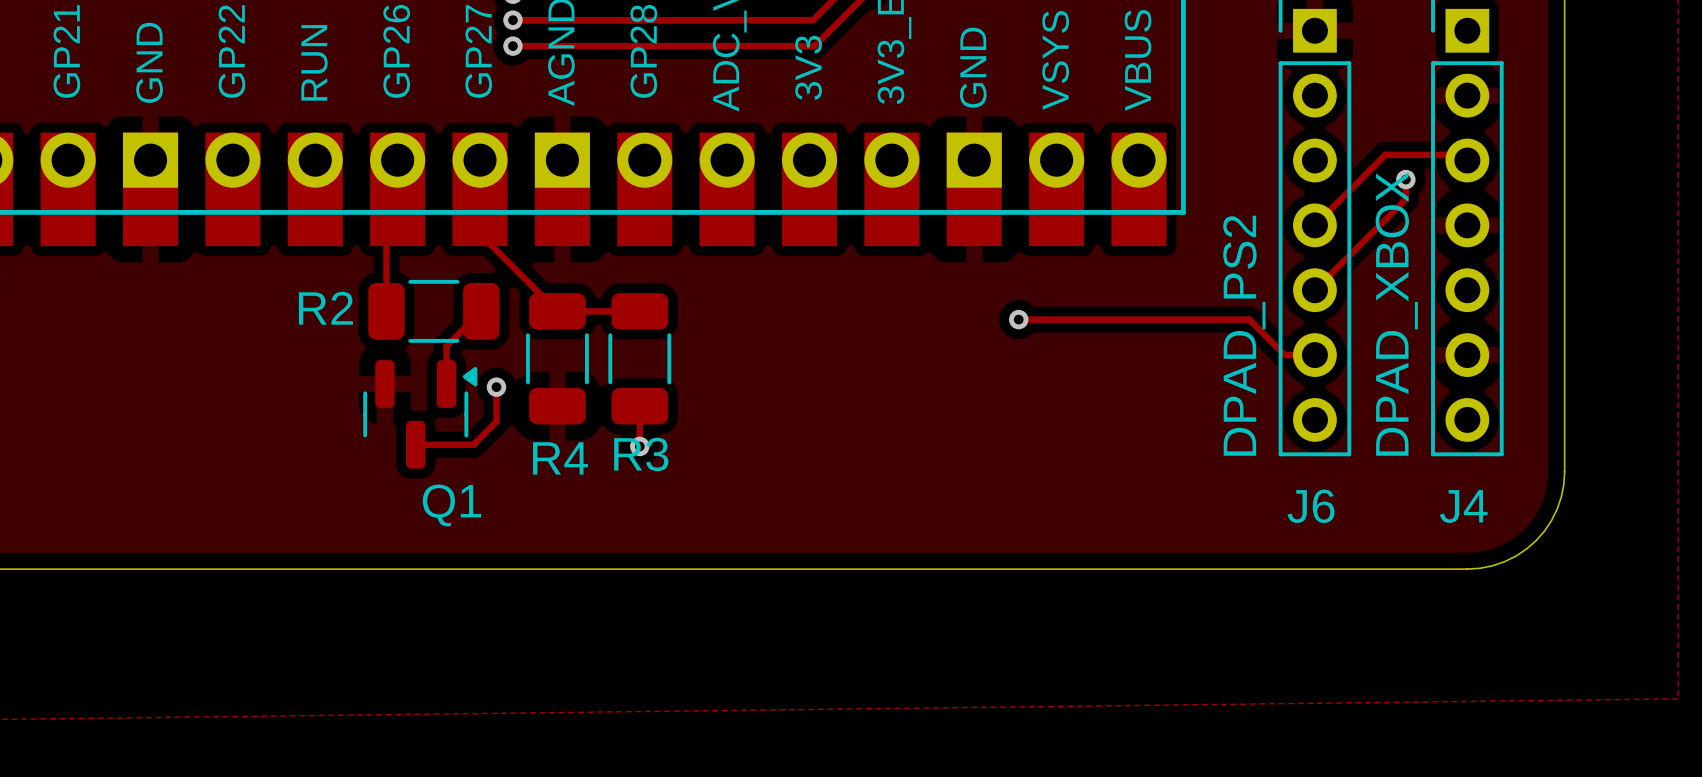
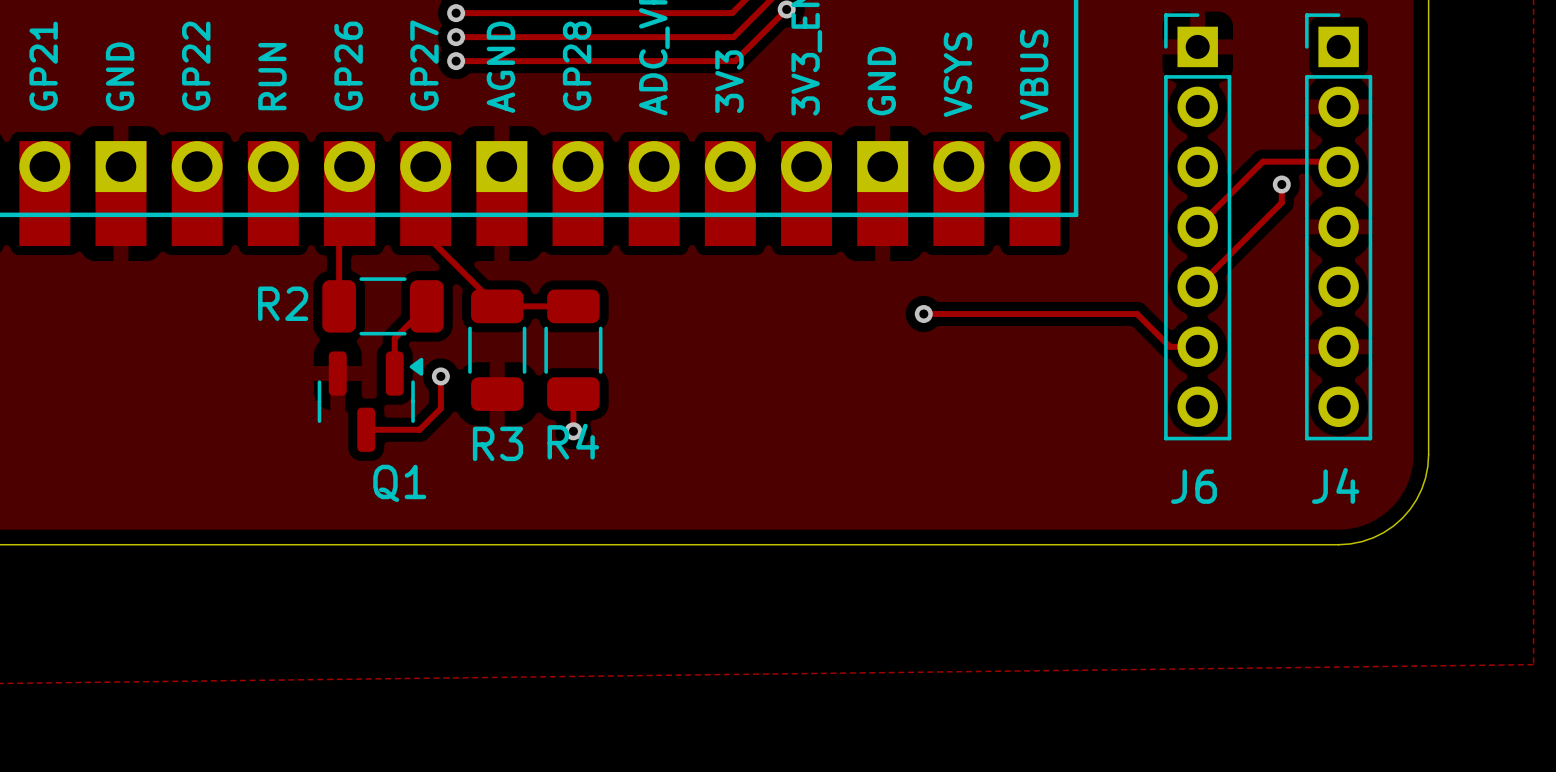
text: DPAD_XBOX (1396, 314) -> none
text: DPAD_PS2 (1244, 335) -> none
R3 name position: R3 (641, 454) -> R3 (497, 443)
R4 name position: R4 (560, 458) -> R4 (573, 441)

